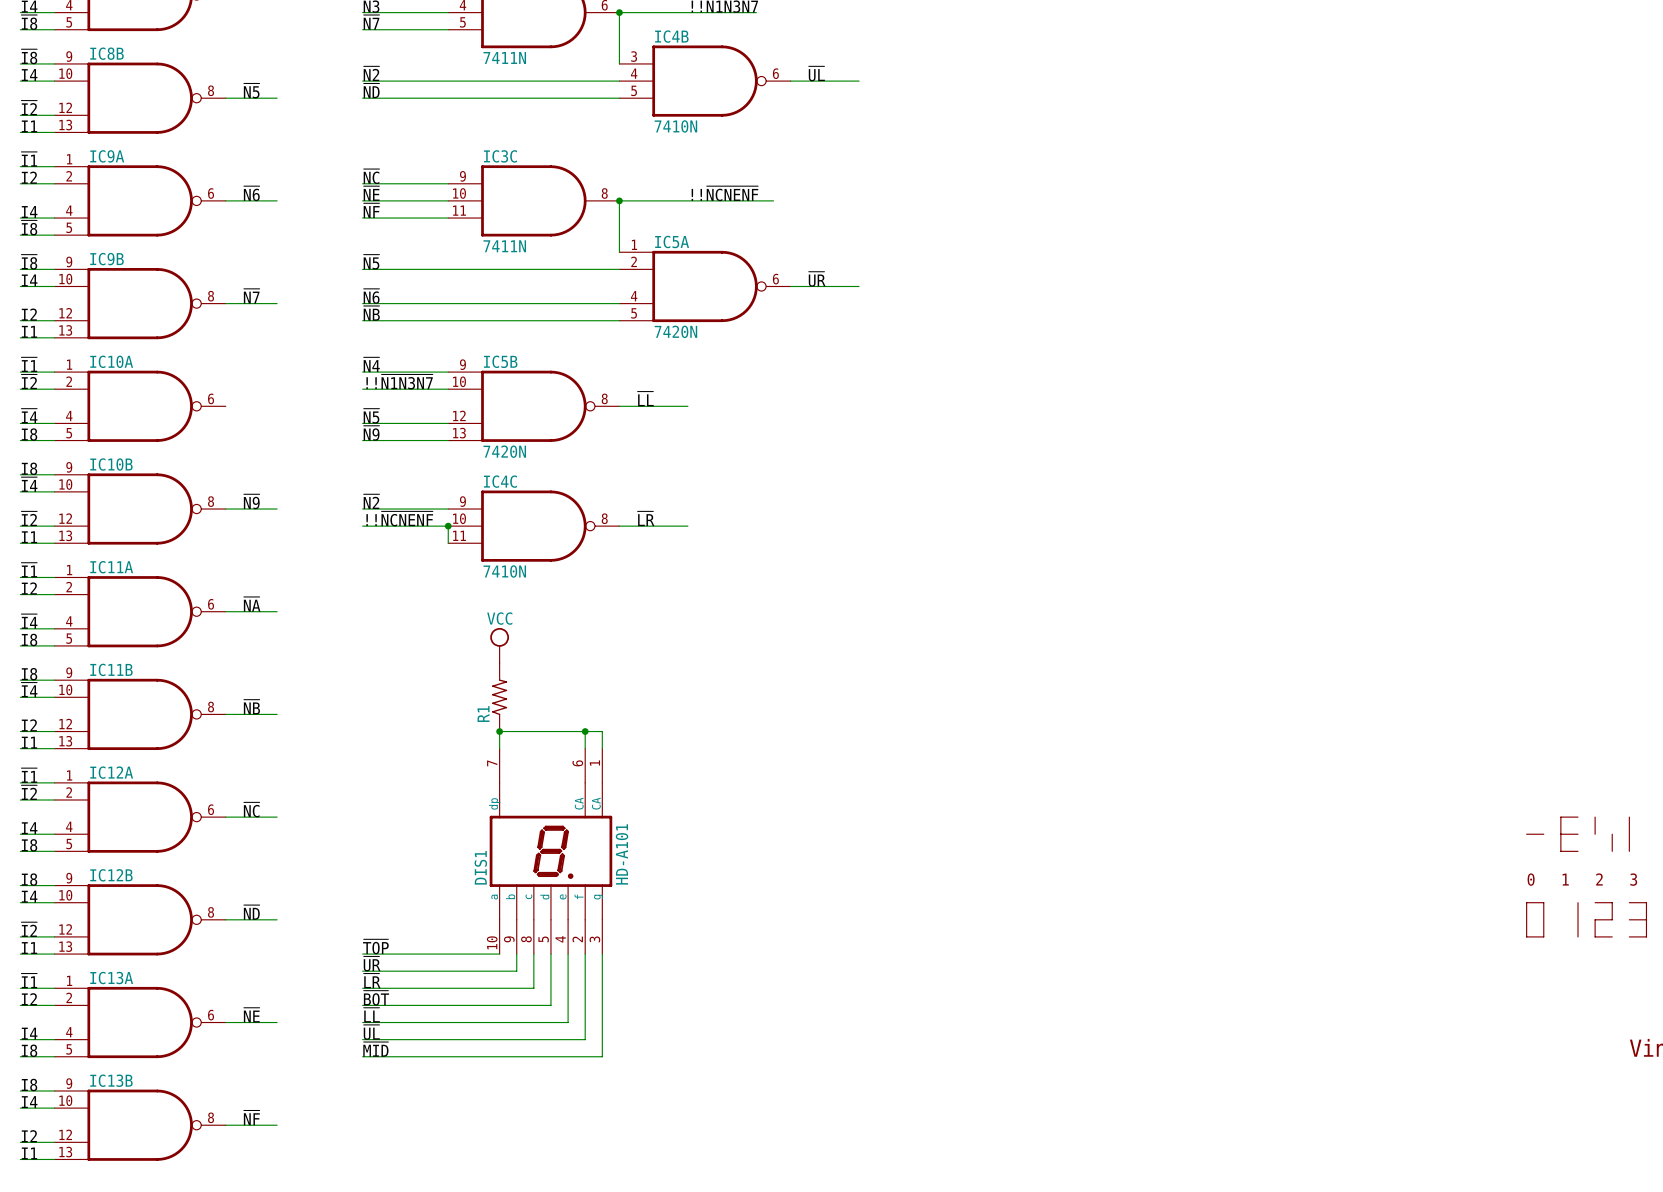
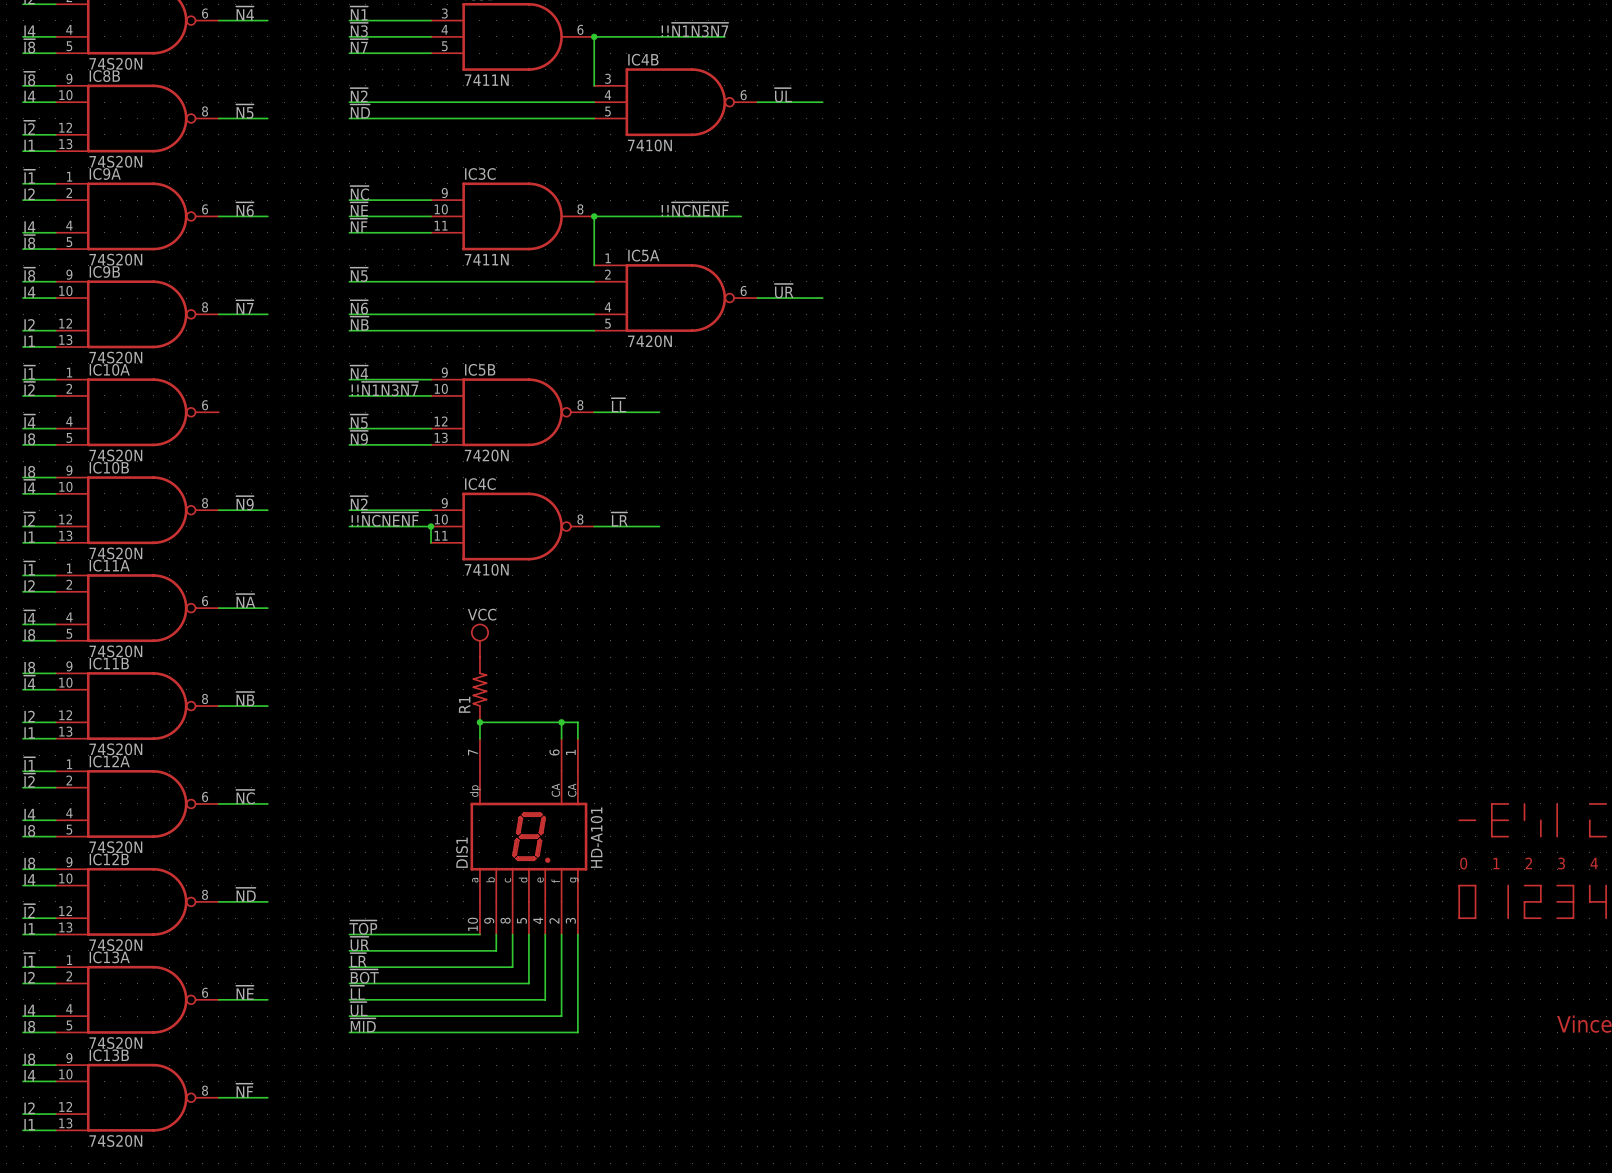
part value: none -> 74S20N (115, 63)
IC8B value: none -> 74S20N (115, 161)
IC9A value: none -> 74S20N (115, 259)
IC9B value: none -> 74S20N (115, 357)
IC10A value: none -> 74S20N (115, 455)
IC10B value: none -> 74S20N (115, 553)
IC11A value: none -> 74S20N (115, 651)
IC11B value: none -> 74S20N (115, 749)
IC12A value: none -> 74S20N (115, 847)
IC12B value: none -> 74S20N (115, 945)
IC13A value: none -> 74S20N (115, 1043)
IC13B value: none -> 74S20N (115, 1141)

